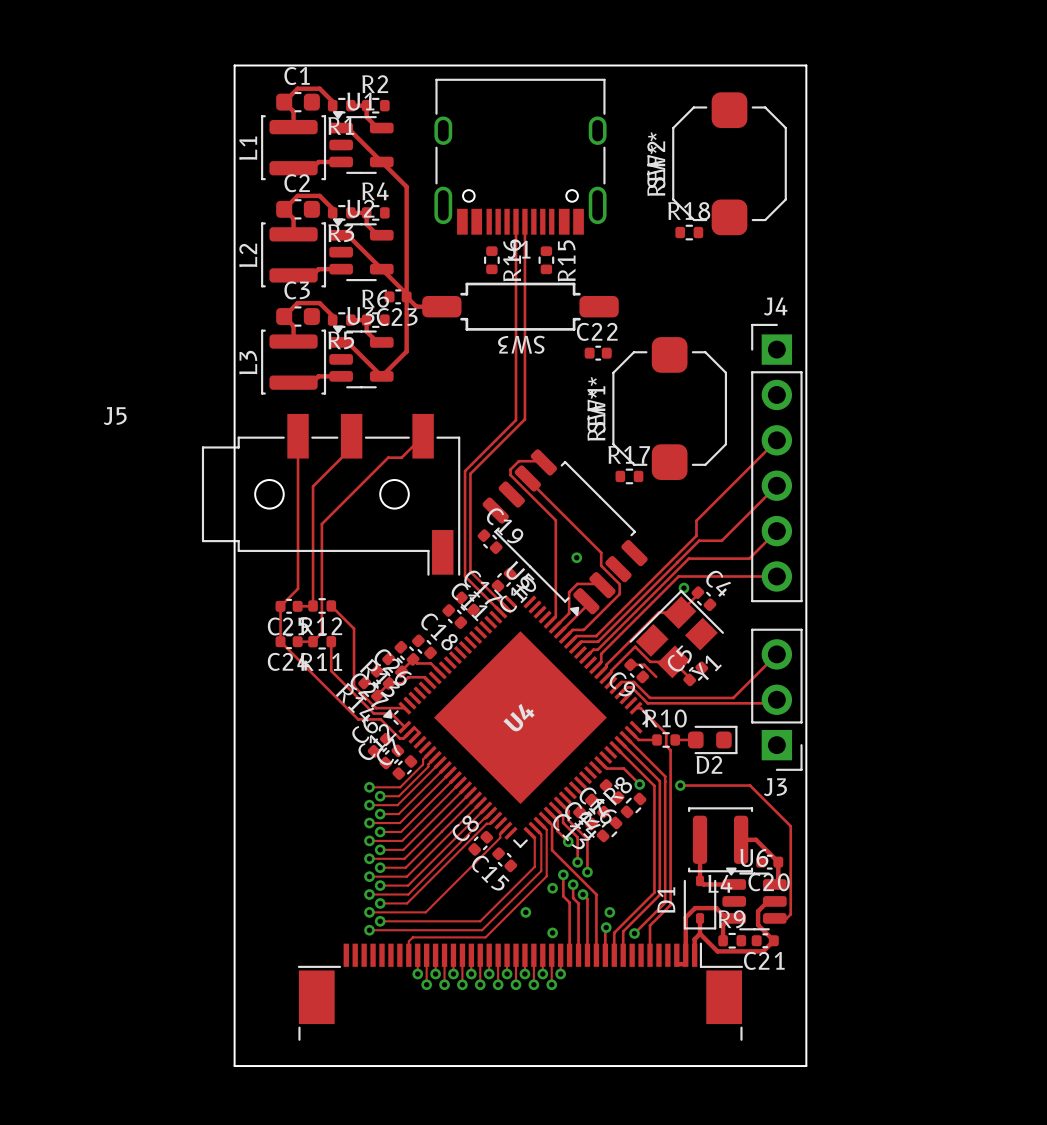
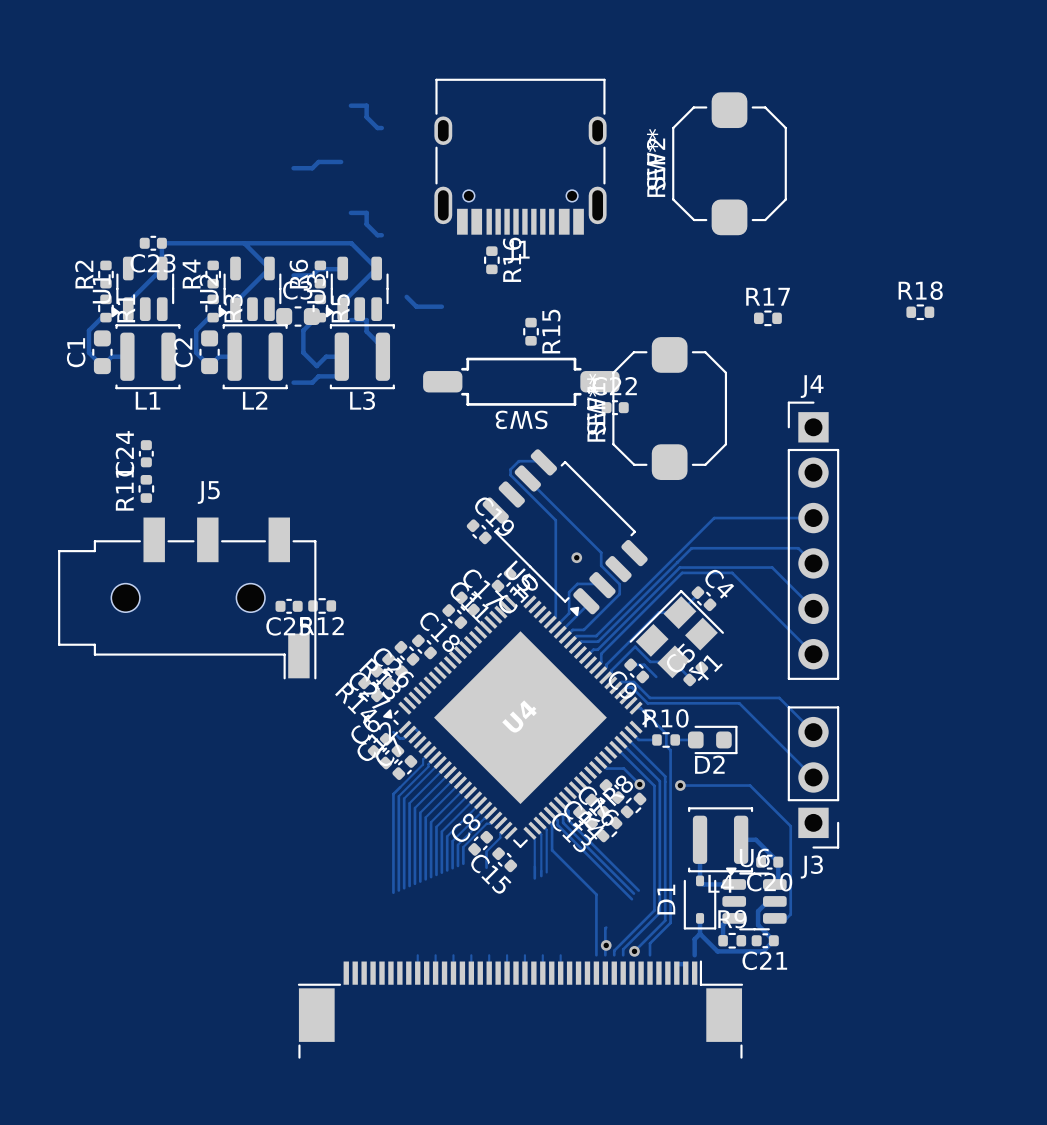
board edge: (234, 65) (806, 65) (806, 1066) (234, 1066) (234, 65) -> none
C1 name position: C1 (297, 76) -> C1 (76, 352)
C1 rotation: 0° (298, 102) -> 90° clockwise (102, 352)
C1 position: (298, 102) -> (102, 352)
track: (332, 105) (332, 101) (319, 88) (297, 88) (284, 102) (293, 111) (293, 127) -> none
R1 rotation: 0° (341, 105) -> 90° clockwise (105, 308)
R1 position: (341, 105) -> (105, 308)
R2 rotation: 0° (375, 105) -> 90° clockwise (105, 274)
R2 position: (375, 105) -> (105, 274)
track: (341, 128) (347, 128) (406, 186) (406, 351) (381, 376) (347, 342) (341, 342) -> none
U1 rotation: 0° (361, 142) -> 90° counterclockwise (142, 288)
U1 position: (361, 142) -> (142, 288)
L1 rotation: 0° (293, 147) -> 90° clockwise (147, 356)
L1 position: (293, 147) -> (147, 356)
L1 name position: L1 (248, 148) -> L1 (148, 400)
C2 name position: C2 (297, 183) -> C2 (183, 352)
C2 rotation: 0° (298, 209) -> 90° clockwise (209, 352)
C2 position: (298, 209) -> (209, 352)
track: (332, 212) (332, 208) (319, 195) (297, 195) (284, 209) (293, 218) (293, 234) -> none
R3 rotation: 0° (341, 212) -> 90° clockwise (213, 308)
R3 position: (341, 212) -> (213, 308)
R4 rotation: 0° (375, 212) -> 90° clockwise (213, 274)
R4 position: (375, 212) -> (213, 274)
track: (516, 221) (516, 420) (465, 471) (465, 576) (500, 612) -> none
track: (524, 221) (524, 419) (470, 473) (470, 571) (505, 607) -> none
R18 position: (689, 232) -> (920, 312)
track: (341, 235) (347, 235) (406, 294) -> none
track: none -> (244, 243) (269, 268) (235, 302) (235, 309)
U2 rotation: 0° (361, 249) -> 90° counterclockwise (249, 288)
U2 position: (361, 249) -> (249, 288)
L2 rotation: 0° (293, 254) -> 90° clockwise (255, 356)
L2 position: (293, 254) -> (255, 356)
L2 name position: L2 (248, 255) -> L2 (255, 400)
R15 position: (546, 260) -> (531, 331)
C23 position: (398, 296) -> (153, 243)
SW3 position: (520, 306) -> (521, 381)
track: none -> (128, 309) (128, 302) (162, 268) (161, 243) (351, 243) (376, 268) (342, 302) (342, 309)
track: none -> (105, 317) (101, 317) (88, 330) (88, 352) (102, 366) (111, 356) (127, 356)
track: none -> (213, 317) (209, 317) (196, 330) (196, 352) (209, 366) (218, 356) (234, 356)
track: none -> (320, 317) (316, 317) (303, 330) (303, 352) (316, 366) (326, 356) (341, 356)
track: (332, 320) (332, 316) (319, 303) (297, 303) (284, 316) (293, 325) (293, 341) -> none
R5 rotation: 0° (341, 320) -> 90° clockwise (320, 308)
R5 position: (341, 320) -> (320, 308)
R6 rotation: 0° (375, 320) -> 90° clockwise (320, 274)
R6 position: (375, 320) -> (320, 274)
C22 position: (598, 353) -> (615, 407)
U3 rotation: 0° (361, 356) -> 90° counterclockwise (357, 288)
U3 position: (361, 356) -> (357, 288)
L3 name position: L3 (248, 362) -> L3 (362, 400)
L3 rotation: 0° (293, 362) -> 90° clockwise (362, 356)
L3 position: (293, 362) -> (362, 356)
J5 name position: J5 (115, 416) -> J5 (208, 492)
track: (298, 436) (298, 588) (280, 606) (280, 641) (358, 719) (380, 719) (393, 732) -> none
track: (351, 436) (351, 447) (313, 486) (313, 605) (297, 606) -> none
track: (423, 436) (401, 457) (388, 457) (321, 524) (321, 632) (313, 641) (297, 641) -> none
track: (776, 440) (696, 520) (696, 535) -> (813, 518) (714, 518) (696, 535)
J4 position: (776, 463) -> (813, 540)
R17 position: (629, 476) -> (767, 318)
track: (776, 485) (721, 540) (699, 540) (691, 548) -> (813, 563) (798, 548) (691, 548)
J5 position: (331, 494) -> (187, 598)
track: (776, 531) (749, 558) (688, 558) (679, 567) -> (813, 608) (772, 567) (679, 567)
C19 position: (490, 541) -> (479, 531)
track: (678, 576) (776, 576) -> (678, 576) (682, 572) (732, 572) (813, 654)
via: (683, 588) -> none
track: (331, 605) (354, 628) (354, 686) (376, 708) (404, 708) -> none
C24 rotation: 0° (289, 641) -> 90° clockwise (146, 453)
C24 position: (289, 641) -> (146, 453)
R11 rotation: 0° (322, 641) -> 90° clockwise (146, 488)
R11 position: (322, 641) -> (146, 488)
track: (331, 641) (331, 670) (373, 713) (391, 713) (404, 727) -> none
track: (776, 654) (733, 697) -> (813, 732) (779, 697) (733, 697)
track: (401, 671) (413, 659) (417, 663) (430, 663) (440, 672) -> none
track: (430, 682) (424, 677) (408, 677) (402, 683) (389, 683) (377, 695) -> none
track: (776, 699) (773, 703) (739, 703) -> (813, 777) (739, 703)
J3 position: (776, 699) -> (813, 777)
track: (369, 787) (400, 787) -> (393, 892) (393, 794) (400, 787)
via: (369, 787) -> none
track: (380, 796) (398, 796) -> (398, 890) (398, 796)
via: (380, 796) -> none
track: (404, 798) (397, 805) (369, 805) -> (404, 798) (404, 888)
track: (409, 803) (398, 814) (380, 814) -> (409, 803) (409, 886)
via: (369, 805) -> none
track: (414, 807) (399, 823) (369, 823) -> (414, 807) (414, 883)
track: (420, 812) (401, 831) (380, 831) -> (420, 812) (420, 881)
via: (380, 814) -> none
track: (425, 817) (402, 840) (369, 840) -> (425, 817) (425, 879)
track: (431, 822) (403, 849) (380, 849) -> (431, 822) (431, 877)
via: (369, 823) -> none
track: (557, 825) (557, 831) (568, 841) -> (557, 825) (631, 899)
track: (436, 826) (404, 858) (369, 858) -> (436, 826) (436, 874)
via: (380, 831) -> none
track: (441, 831) (405, 867) (380, 867) -> (441, 831) (441, 872)
track: (447, 836) (406, 876) (369, 876) -> (447, 836) (447, 870)
track: (577, 837) (577, 862) -> (577, 837) (633, 893)
track: (587, 839) (587, 872) -> (587, 839) (638, 890)
via: (369, 840) -> none
track: (452, 841) (408, 885) (380, 885) -> (452, 841) (452, 868)
via: (568, 841) -> none
track: (457, 844) (408, 894) (369, 894) -> (457, 844) (457, 865)
track: (463, 847) (407, 903) (380, 903) -> (463, 847) (463, 863)
via: (380, 849) -> none
track: (486, 851) (425, 912) (369, 912) -> (486, 851) (486, 867)
via: (369, 858) -> none
via: (577, 862) -> none
track: (534, 866) (480, 921) (380, 921) -> (534, 866) (534, 878)
via: (380, 867) -> none
track: (541, 870) (482, 930) (369, 930) -> (541, 870) (541, 876)
track: (546, 872) (546, 876) (485, 937) (412, 937) (408, 941) (408, 955) -> none
via: (587, 872) -> none
track: (563, 874) (563, 896) (569, 902) (569, 955) -> none
via: (563, 874) -> none
via: (369, 876) -> none
track: (573, 884) (573, 898) (578, 903) (578, 955) -> none
via: (573, 884) -> none
via: (380, 885) -> none
via: (552, 888) -> none
track: (654, 892) (614, 932) (614, 950) -> (654, 892) (654, 910) (614, 950)
via: (369, 894) -> none
track: (583, 894) (587, 898) (587, 955) -> none
via: (583, 894) -> none
track: (659, 894) (623, 931) (623, 949) -> (659, 894) (659, 912) (623, 949)
track: (665, 902) (634, 933) -> (665, 902) (665, 920) (634, 951)
via: (380, 903) -> none
track: (670, 905) (650, 925) (650, 943) -> (670, 905) (670, 922) (650, 943)
via: (369, 912) -> none
via: (525, 912) -> none
via: (609, 912) -> none
track: (729, 918) (726, 918) (716, 908) (695, 908) (685, 917) (685, 955) -> none
via: (380, 921) -> none
via: (606, 927) -> none
via: (369, 930) -> none
via: (552, 932) -> none
via: (634, 933) -> none
via: none -> (606, 945)
via: none -> (634, 951)
track: (426, 955) (426, 984) -> none
track: (444, 955) (444, 984) -> none
track: (462, 955) (462, 984) -> none
track: (480, 955) (480, 984) -> none
track: (498, 955) (498, 984) -> none
track: (516, 955) (516, 984) -> none
track: (533, 955) (533, 984) -> none
track: (551, 955) (551, 984) -> none
via: (417, 974) -> none
via: (435, 974) -> none
via: (453, 974) -> none
via: (471, 974) -> none
via: (489, 974) -> none
via: (507, 974) -> none
via: (524, 974) -> none
via: (542, 974) -> none
via: (560, 974) -> none
via: (426, 984) -> none
via: (444, 984) -> none
via: (462, 984) -> none
via: (480, 984) -> none
via: (498, 984) -> none
via: (516, 984) -> none
via: (533, 984) -> none
via: (551, 984) -> none
part position: (520, 991) -> (520, 1009)

